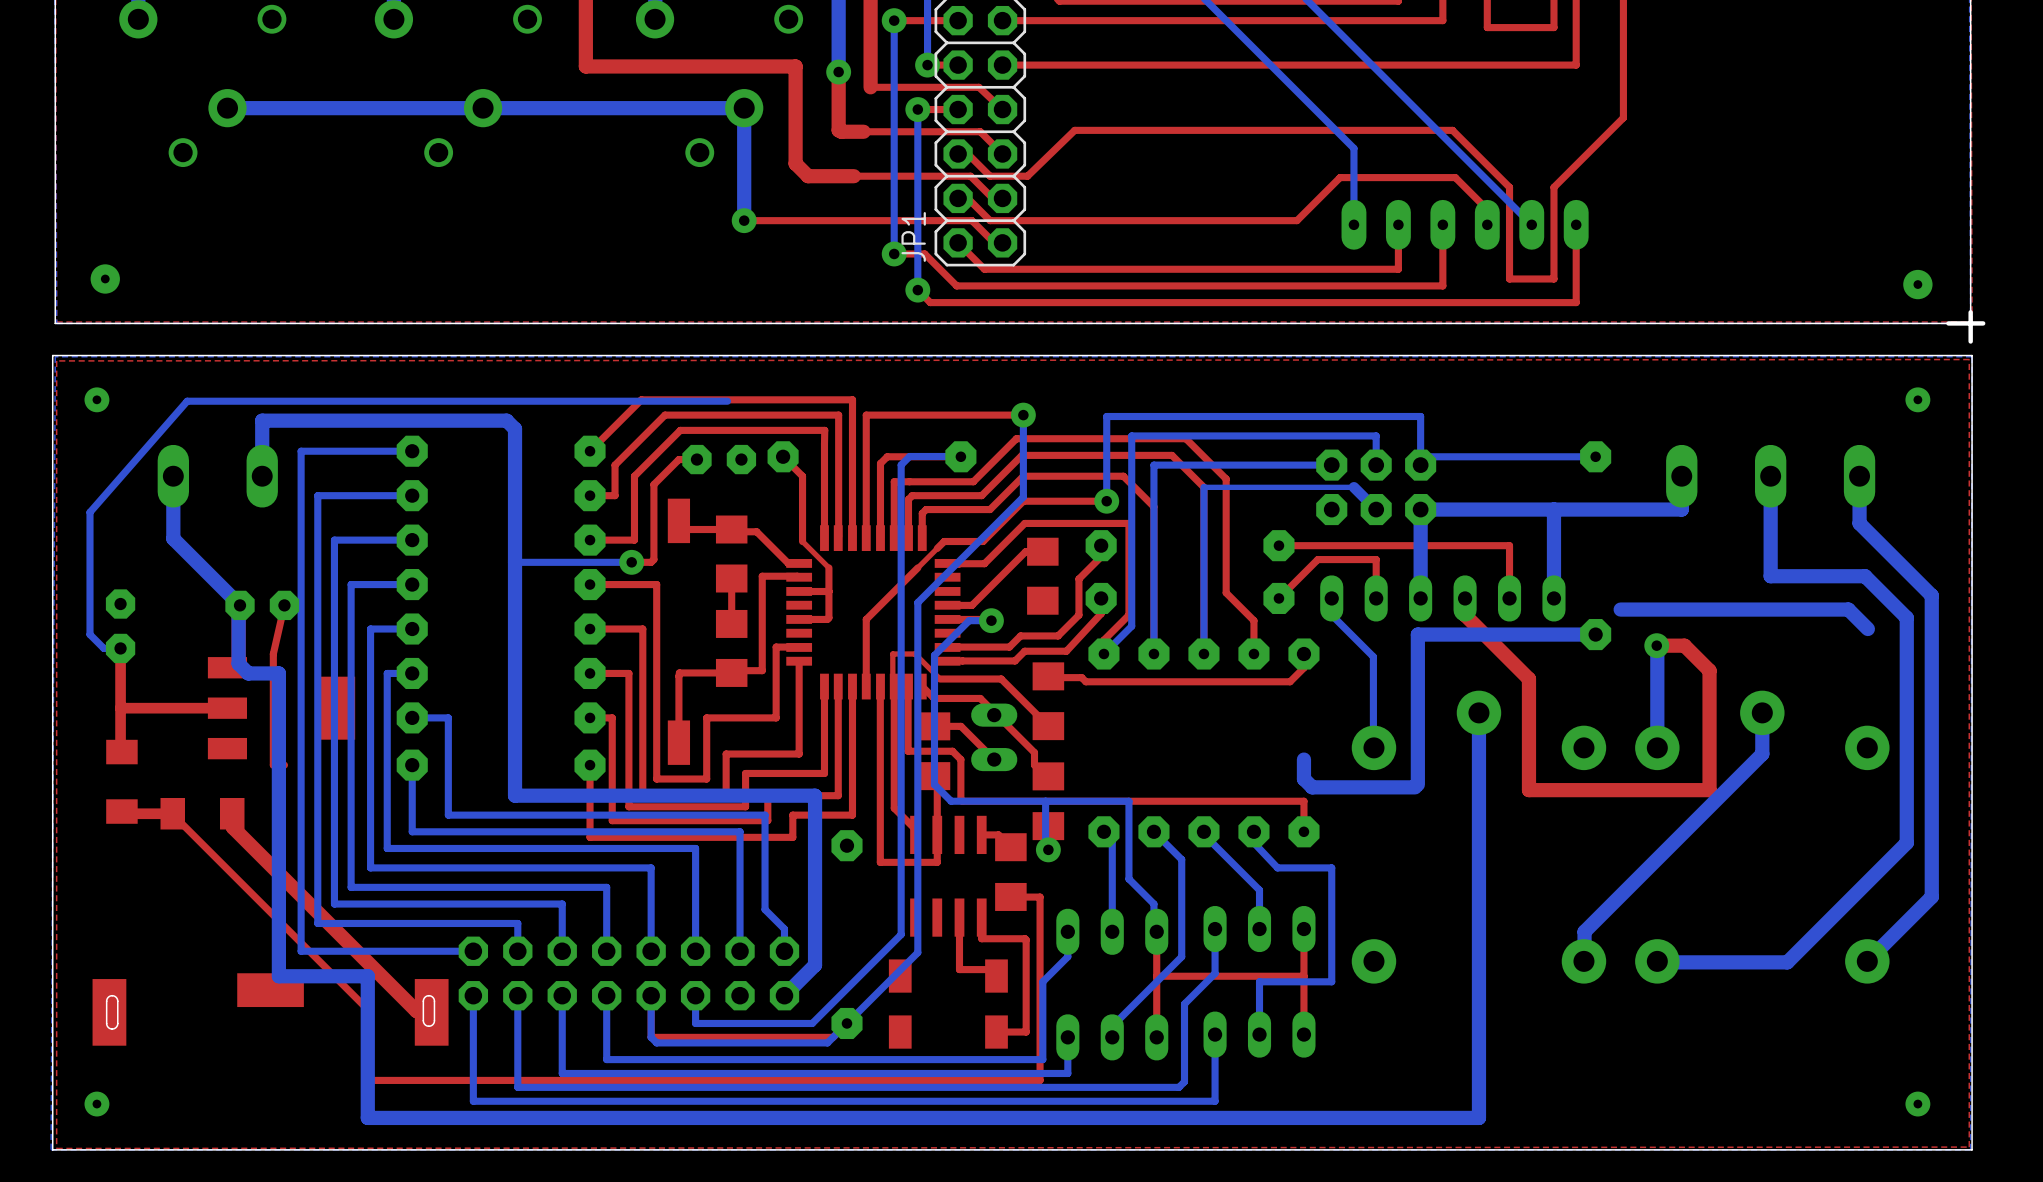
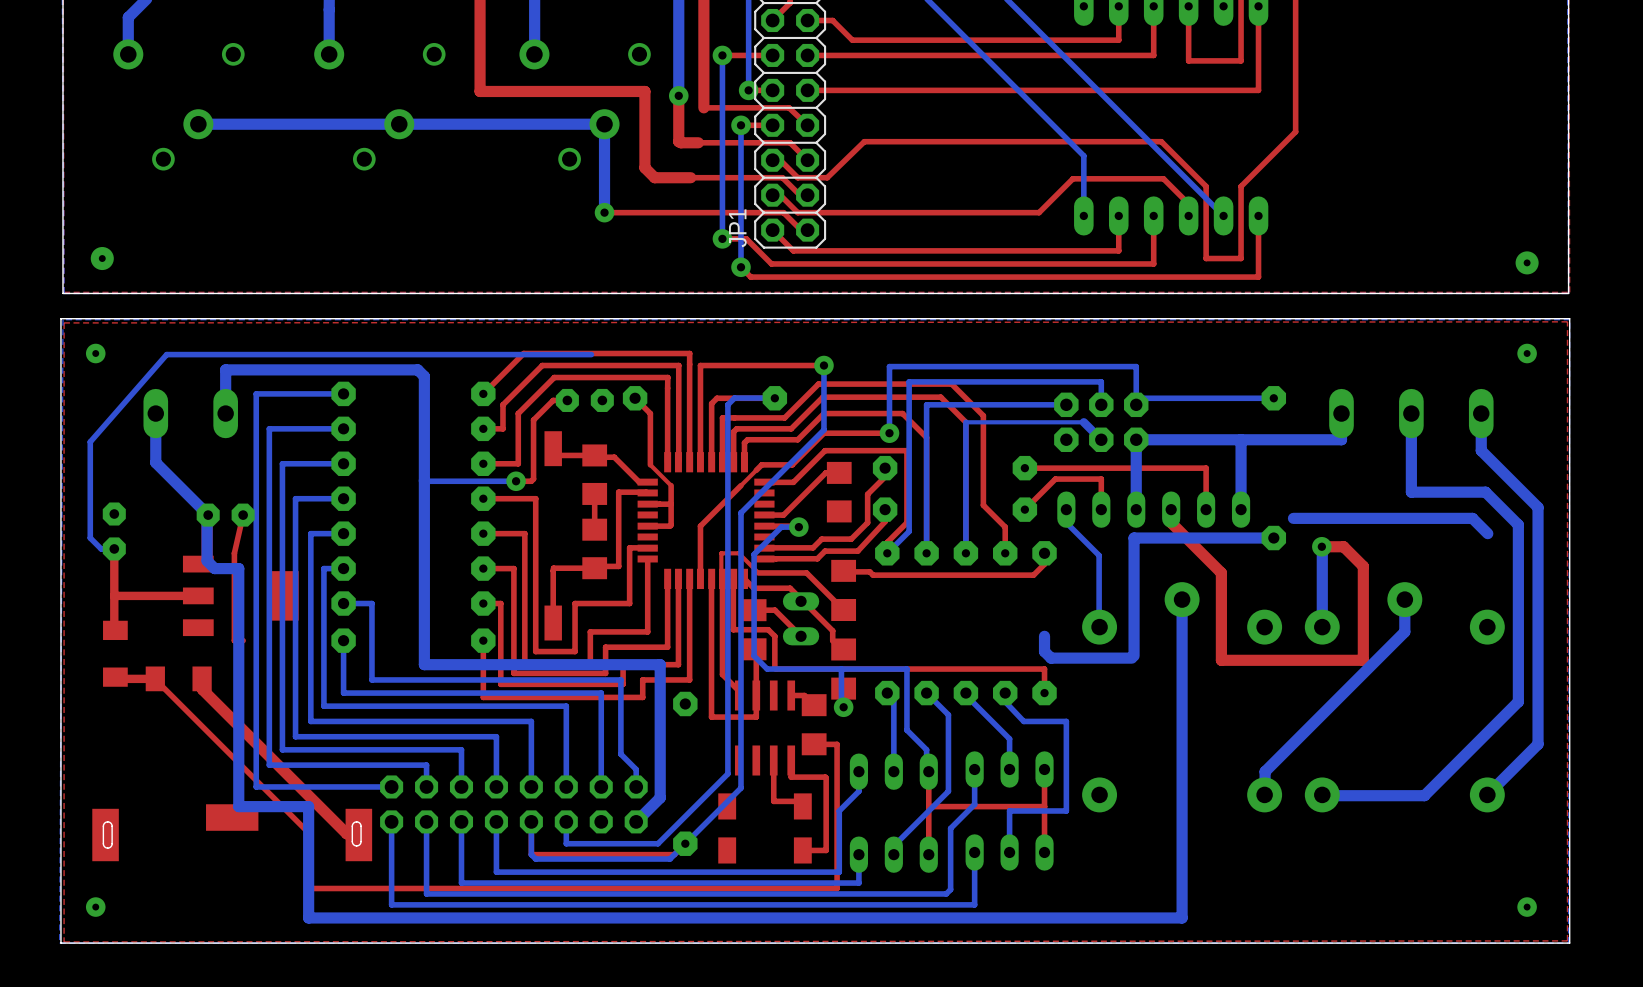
board edge: (1970, 312) (1970, 341) -> none
board edge: (1983, 323) (1948, 323) -> none

